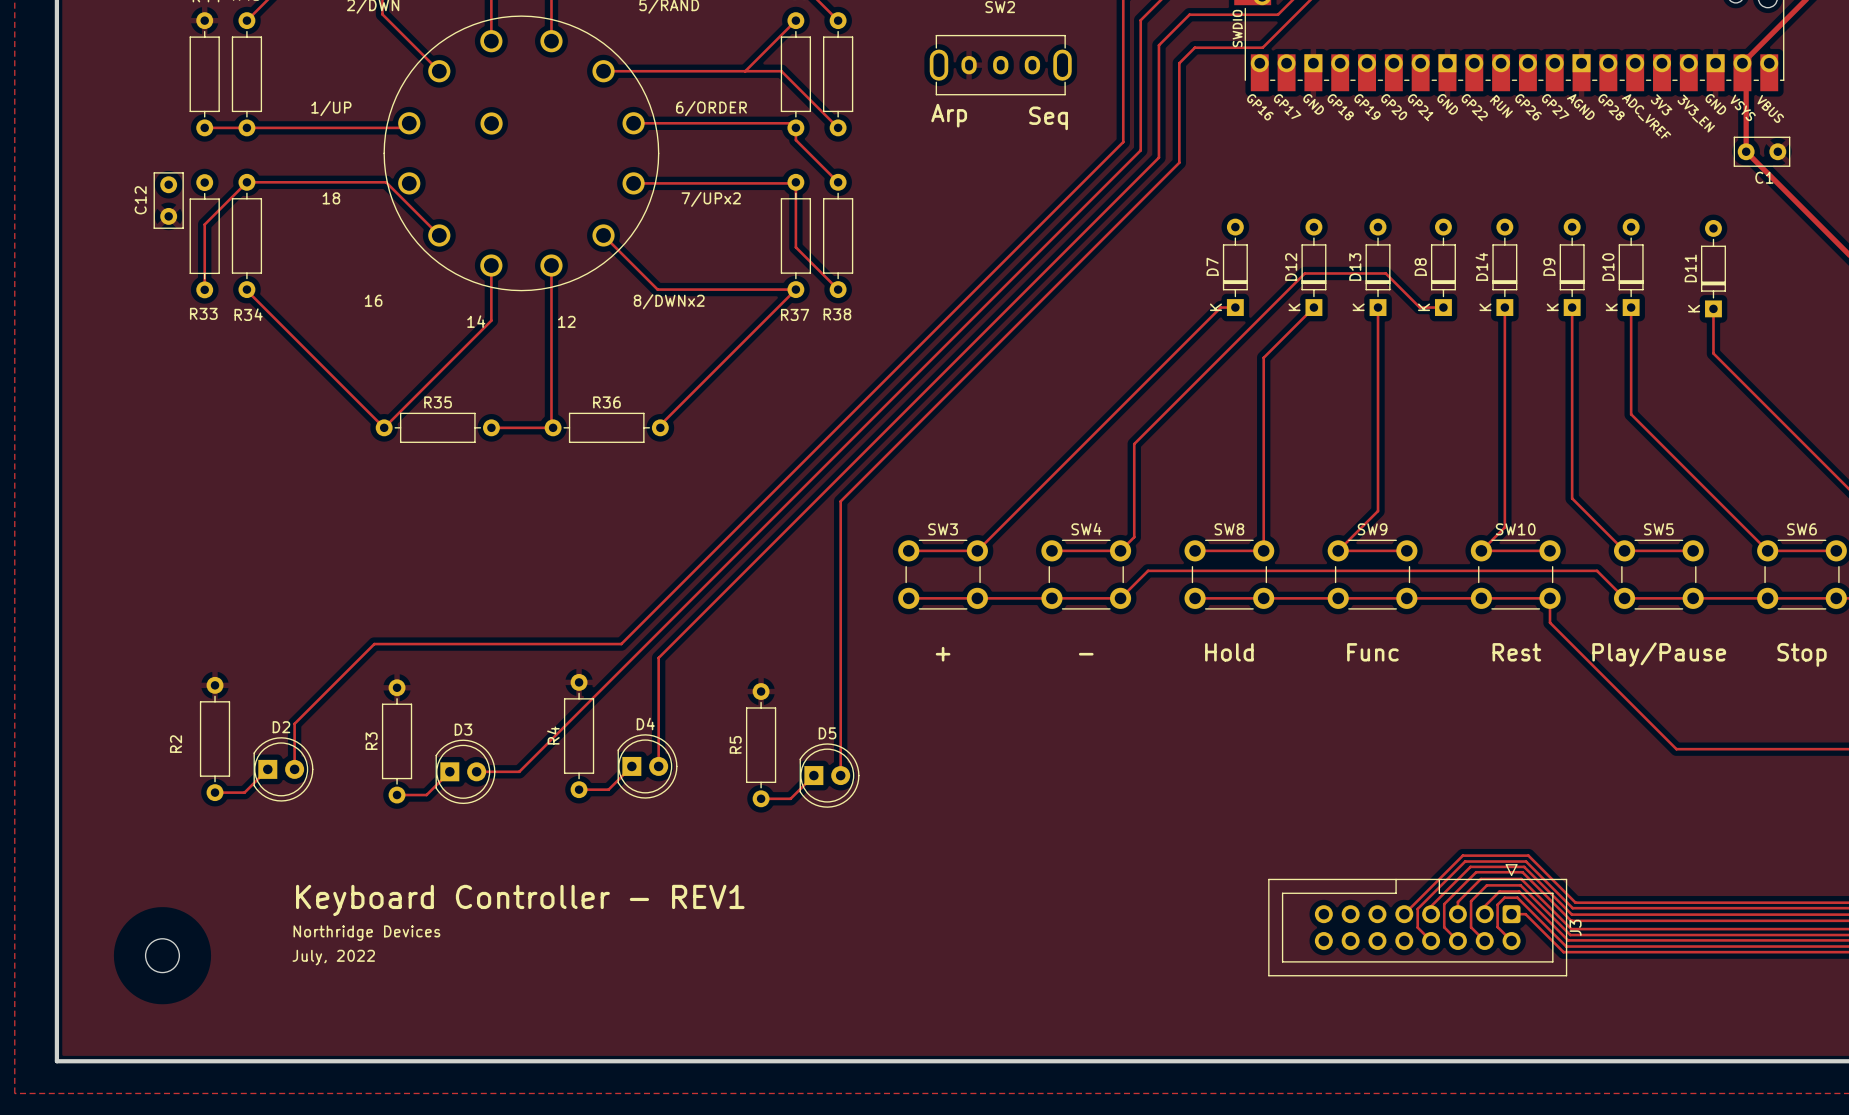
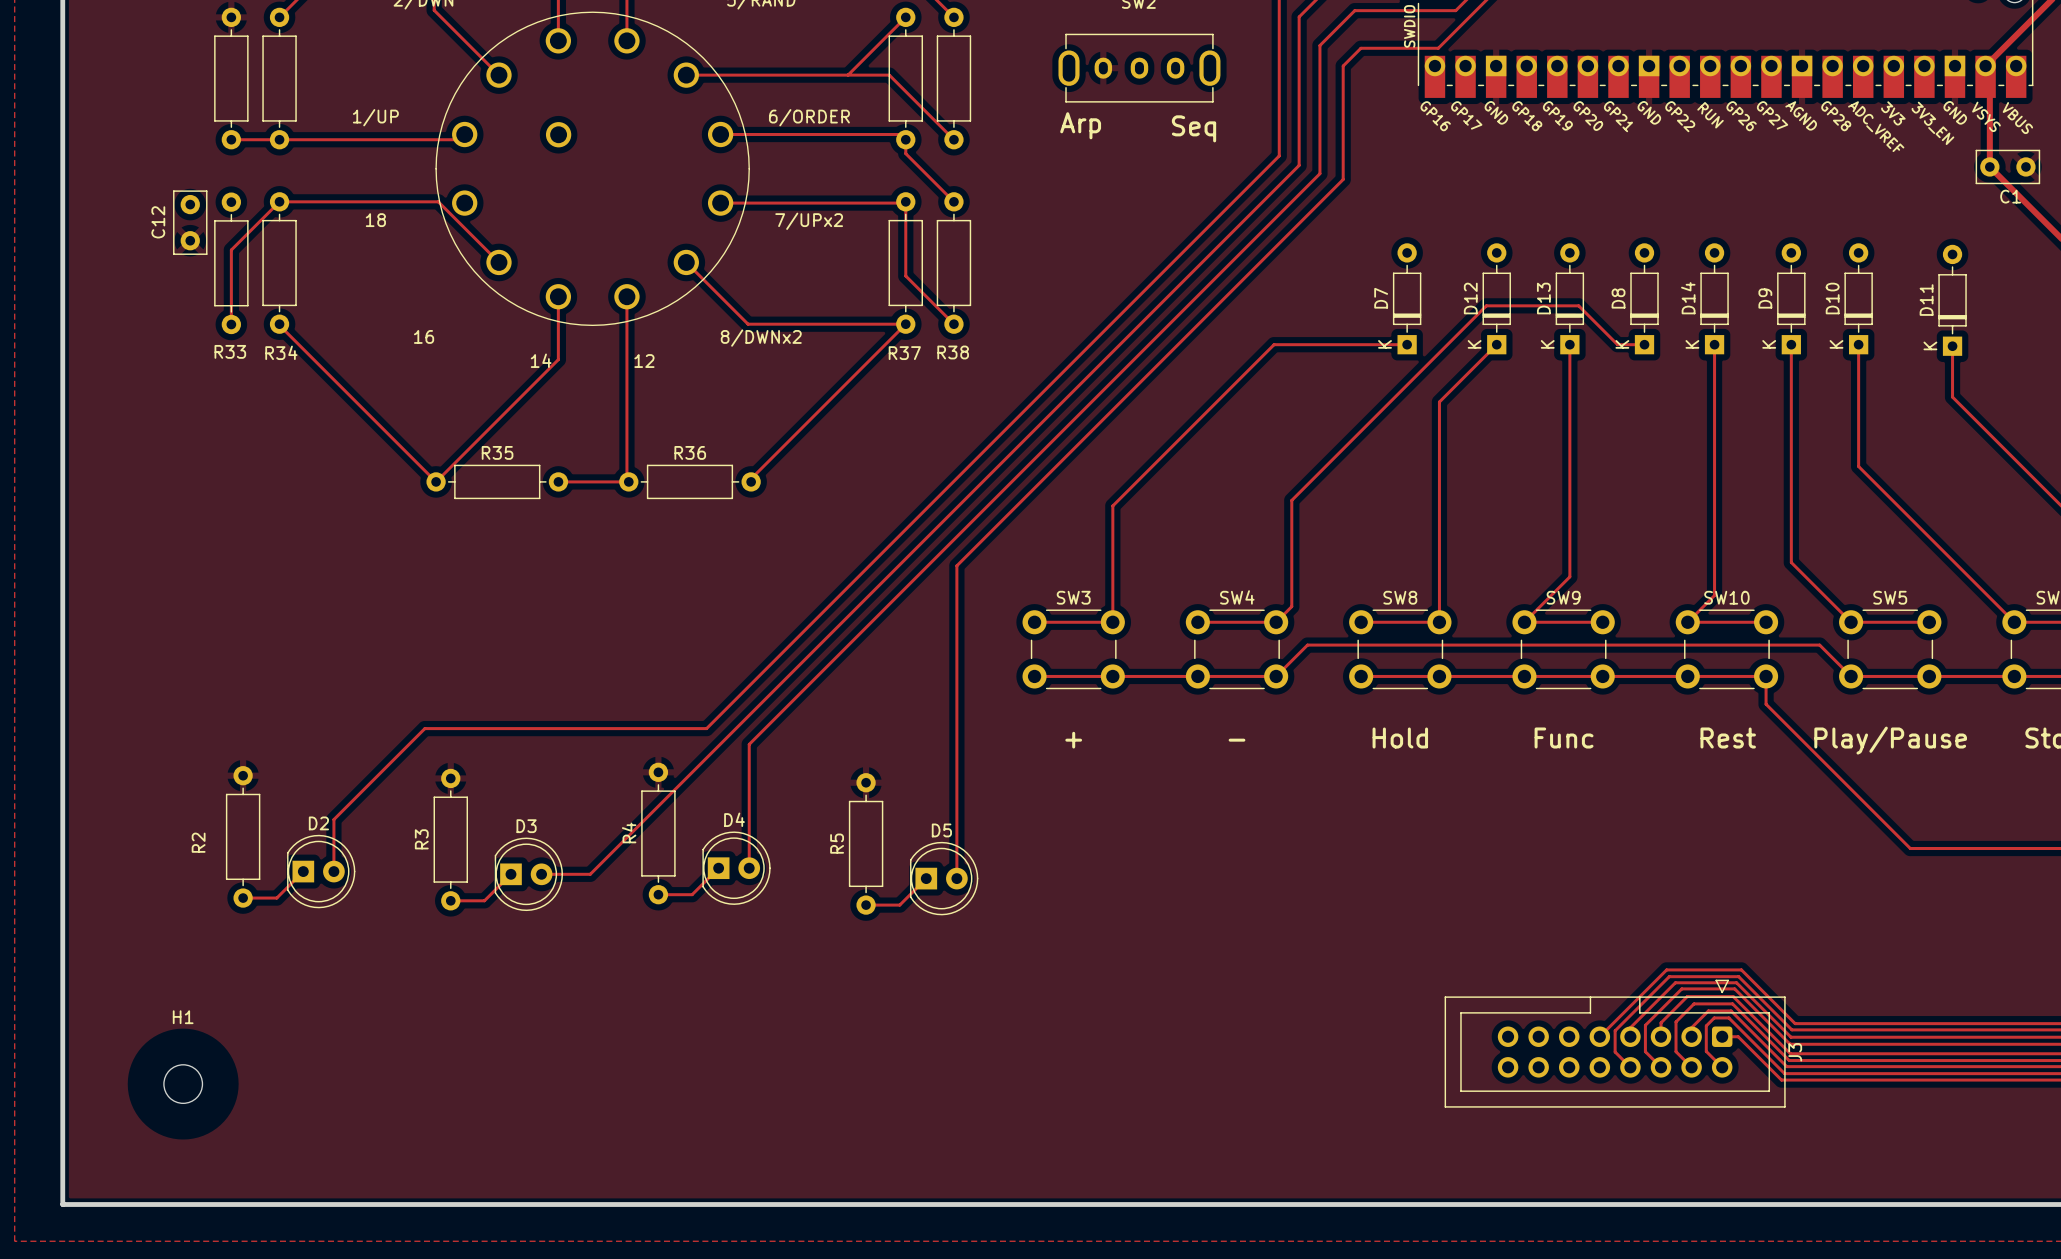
track: (1220, 307) (977, 550) -> (1390, 344) (1274, 344) (1112, 505) (1112, 622)
H1 name: none -> H1 (183, 1017)
text: Keyboard Controller - REV1 (520, 900) -> none
text: Northridge Devices (366, 933) -> none
text: July, 2022 (333, 957) -> none

